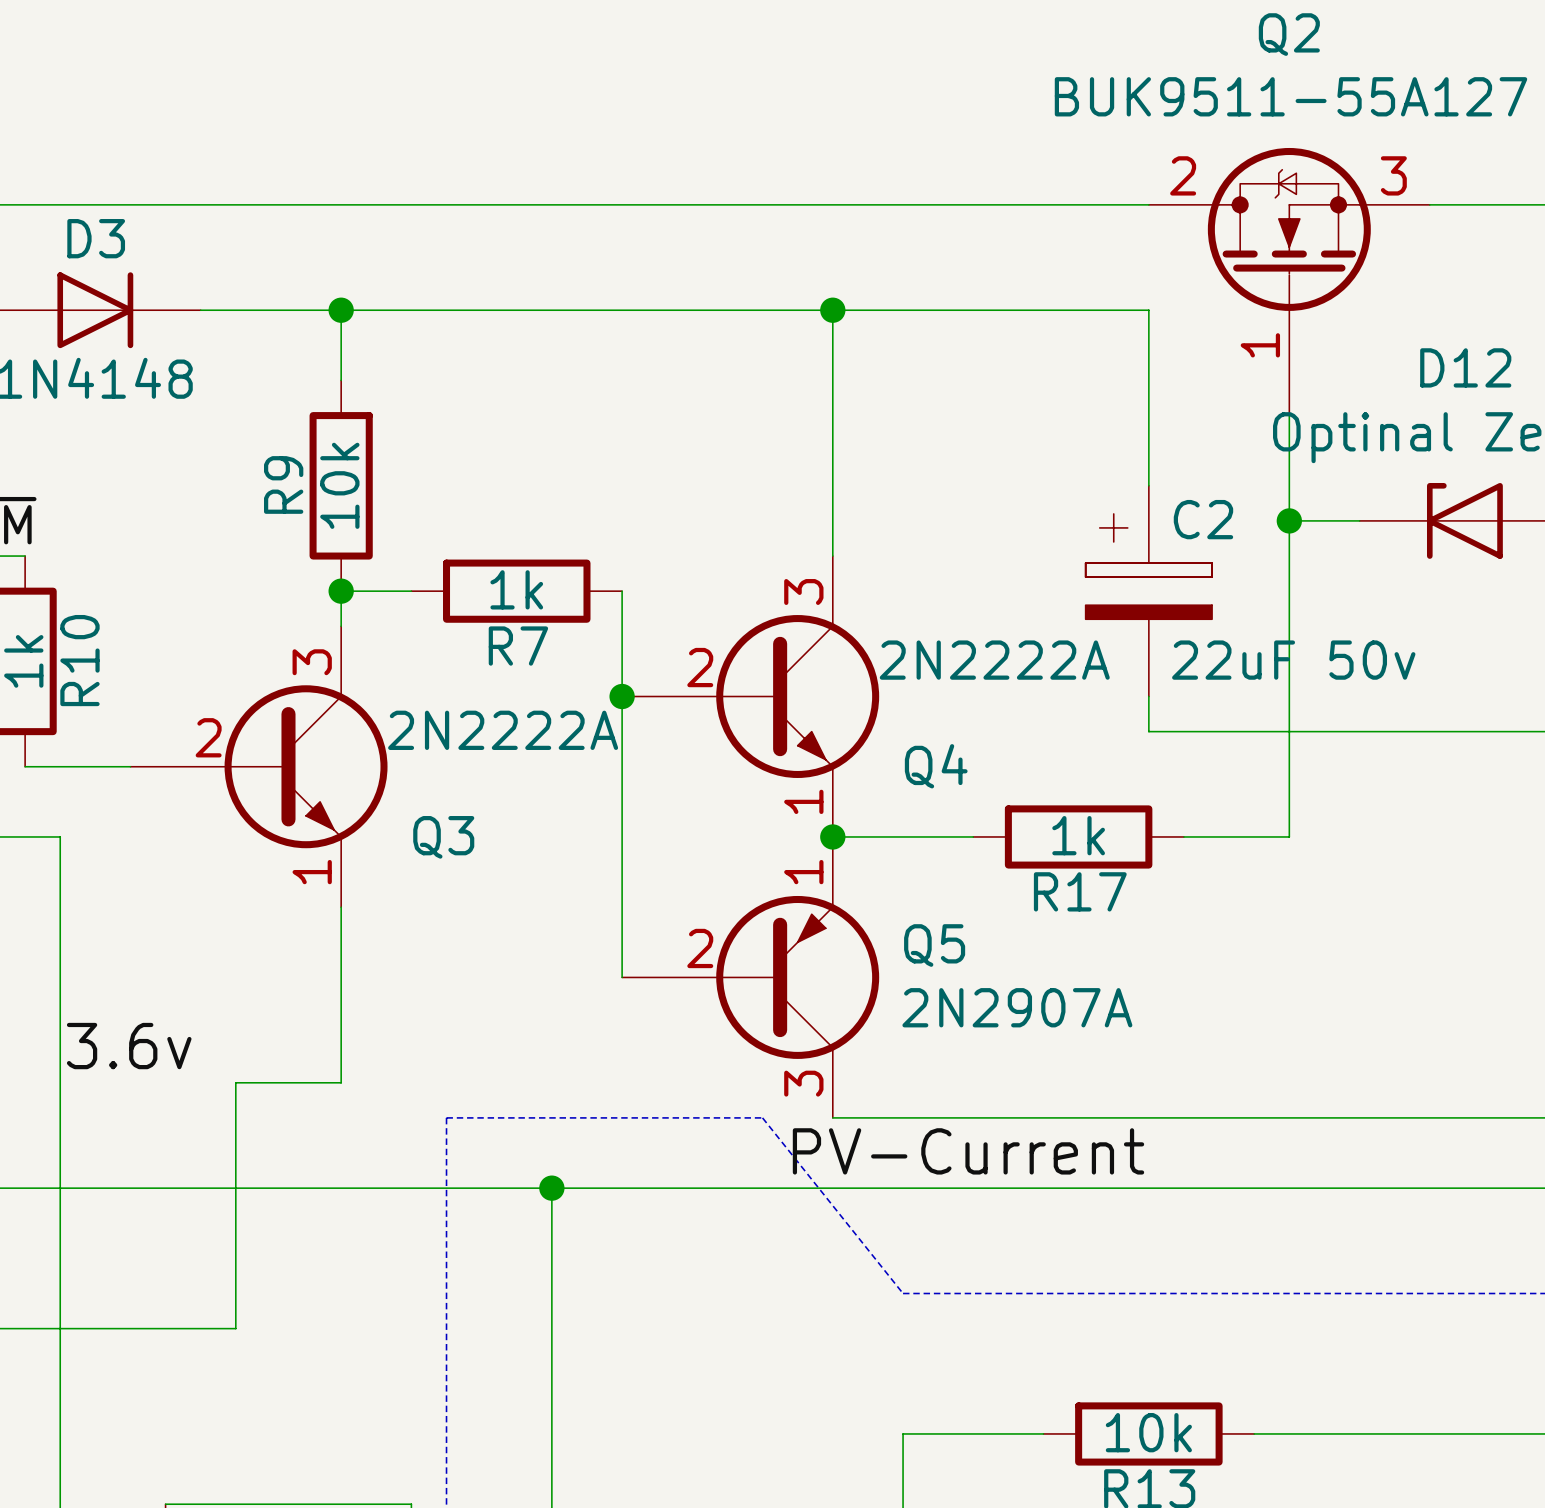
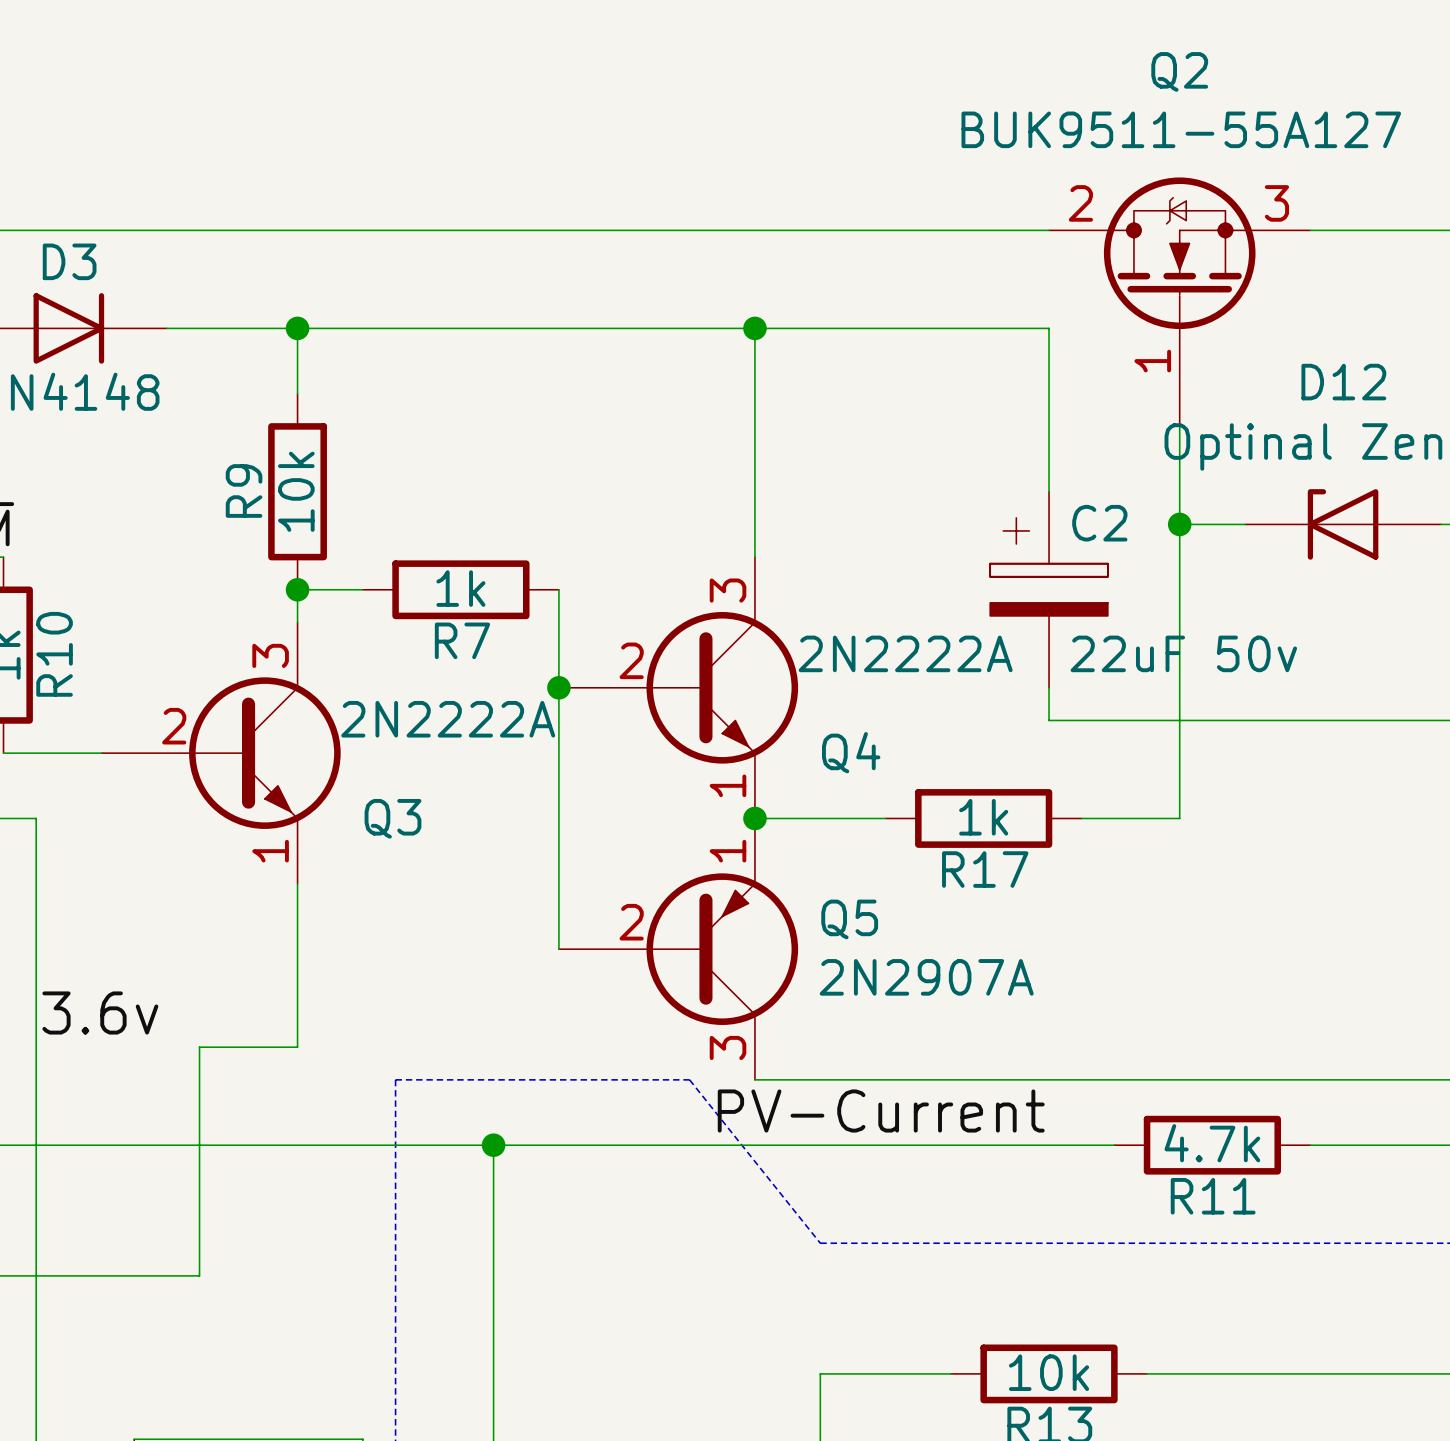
wire: (1219, 1188) (1429, 1188) -> none
R11: none -> 4.7k (1212, 1145)

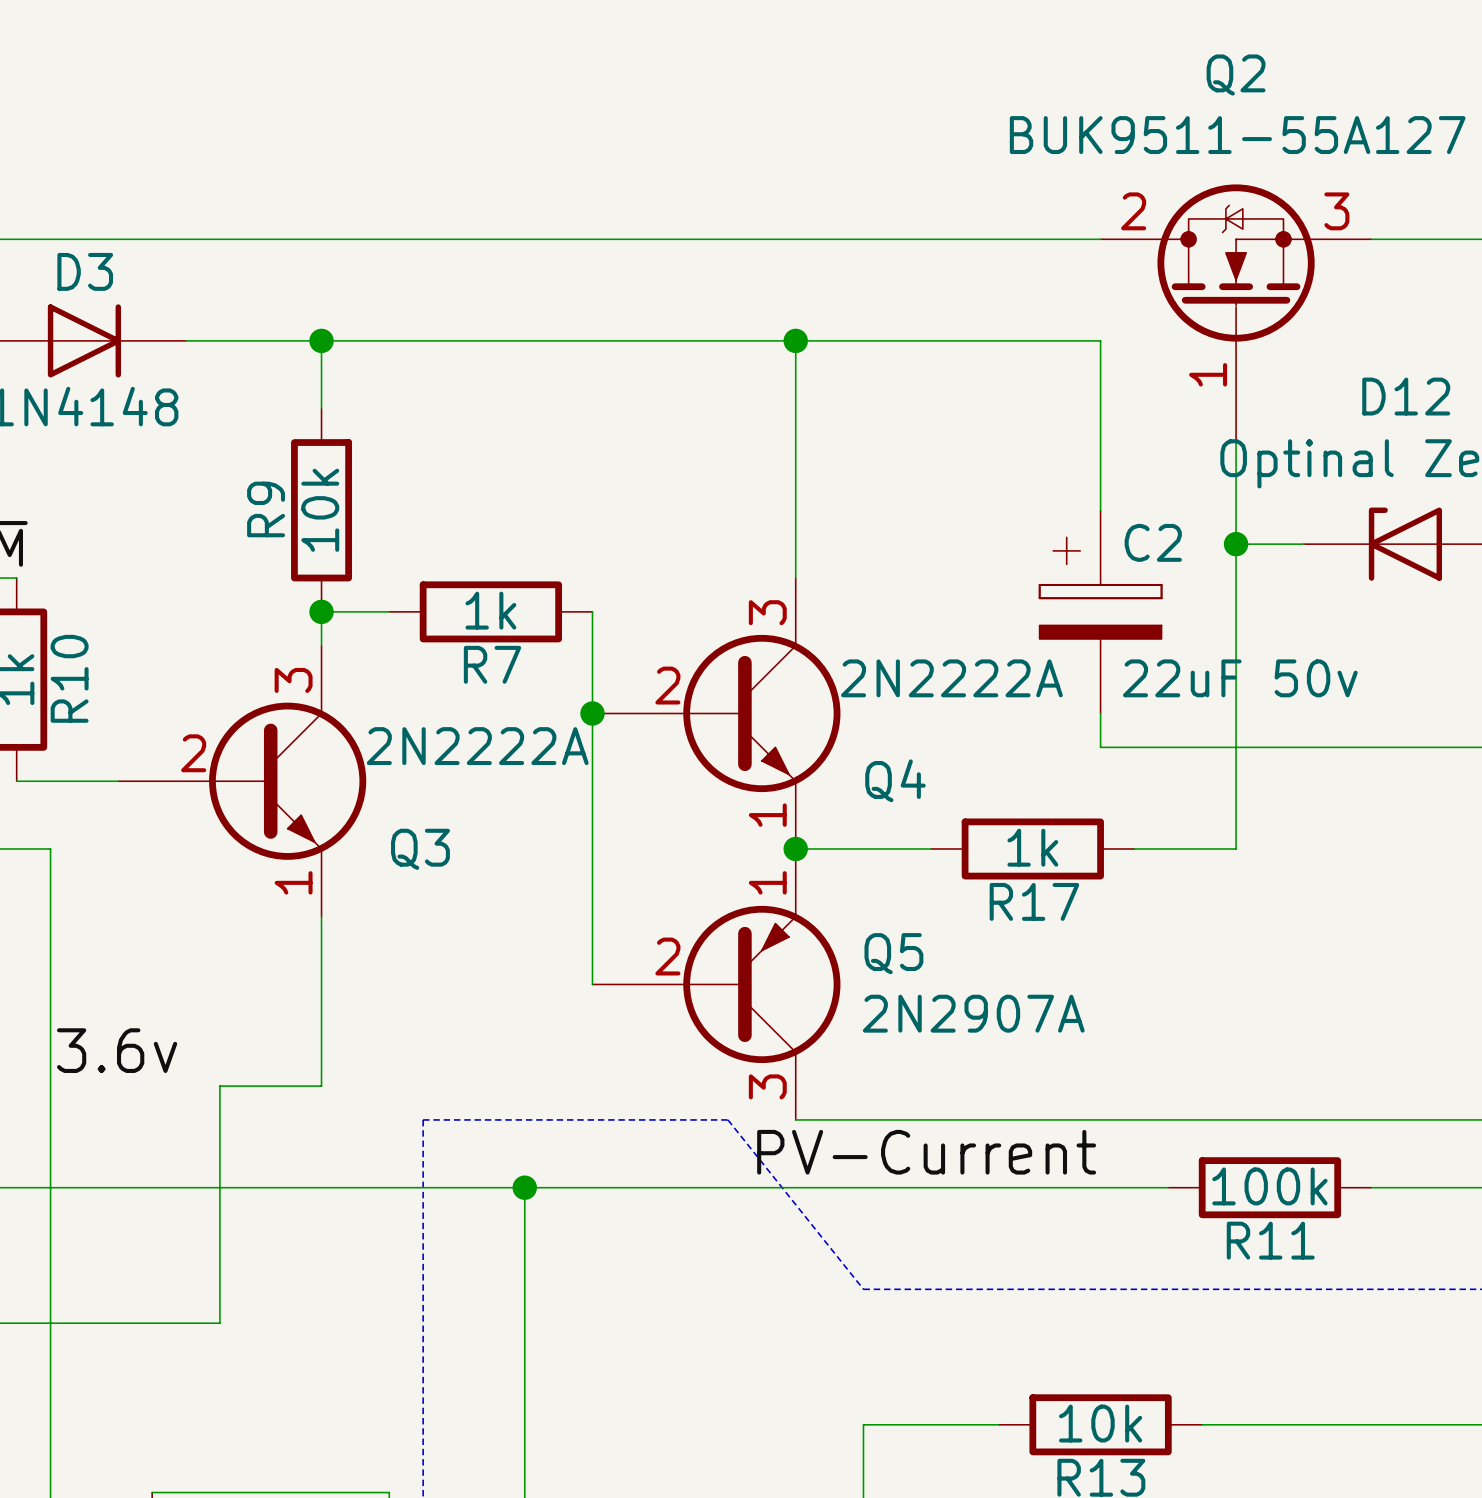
R11 value: 4.7k (1212, 1143) -> 100k (1269, 1186)

